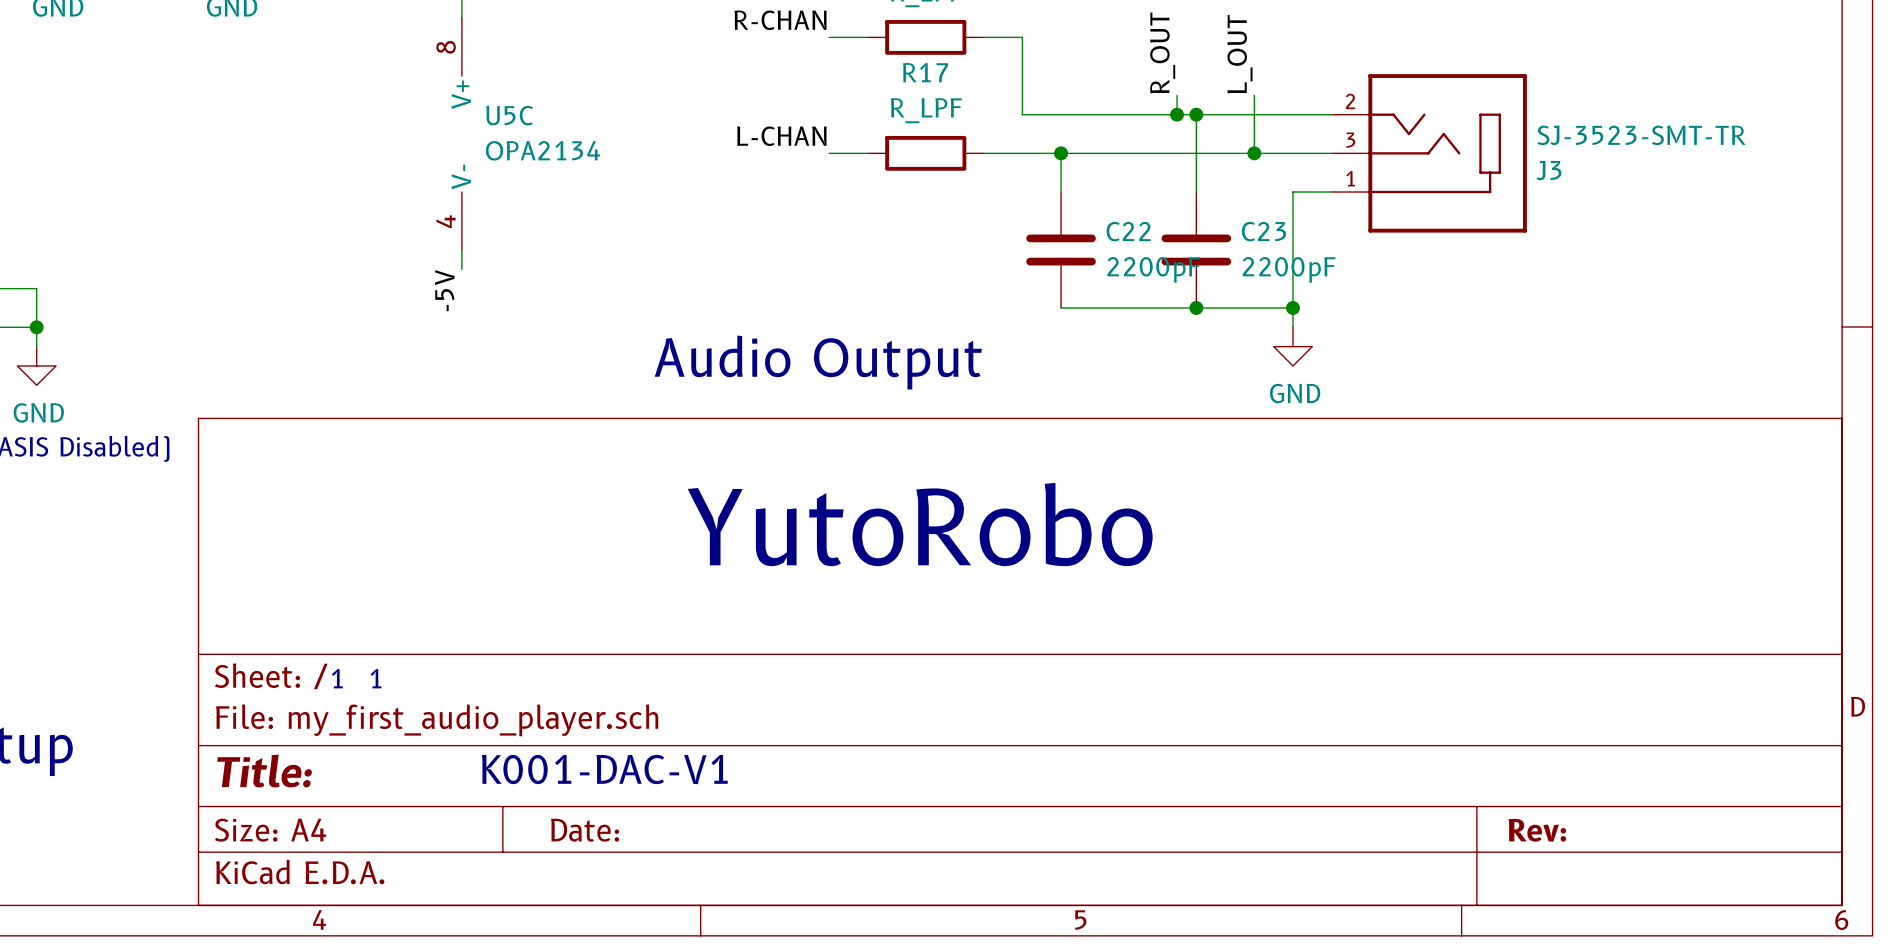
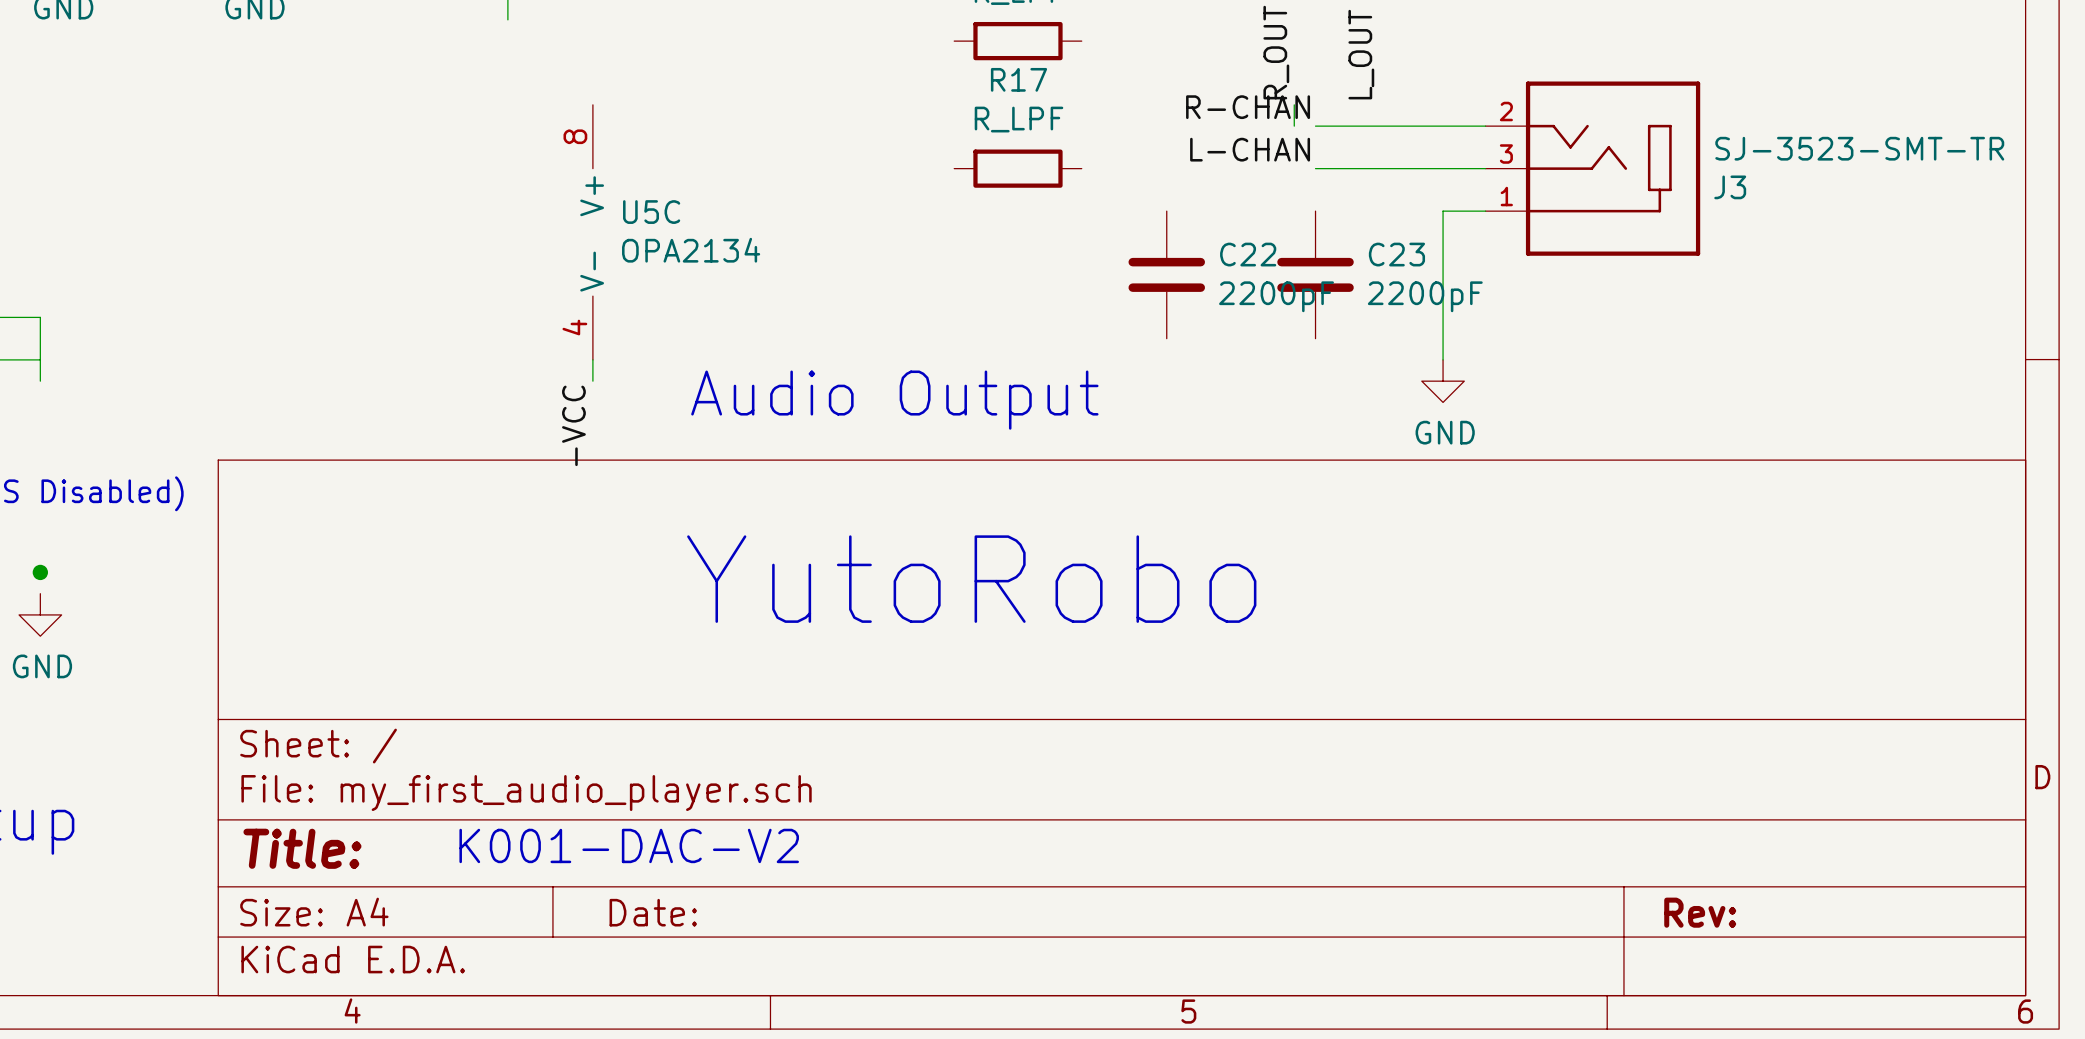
label position: R-CHAN (780, 20) -> R-CHAN (1248, 107)
wire: (829, 37) (867, 37) -> none
wire: (983, 37) (1022, 37) (1022, 114) (1196, 114) (1196, 192) -> none
wire: (1254, 95) (1254, 153) -> none
junction: (1177, 114) -> none
junction: (1196, 114) -> none
U5C position: (461, 134) -> (592, 232)
label position: L-CHAN (781, 136) -> L-CHAN (1250, 149)
wire: (829, 153) (867, 153) -> none
wire: (983, 153) (1196, 153) -> none
wire: (1061, 153) (1061, 192) -> none
junction: (1061, 153) -> none
junction: (1254, 153) -> none
J3 position: (1429, 153) -> (1592, 168)
wire: (1312, 192) (1292, 192) (1292, 327) -> (1443, 211) (1443, 359)
wire: (461, 249) (461, 269) -> (592, 359) (592, 381)
label: -5V (444, 290) -> none
wire: (1061, 307) (1292, 307) -> none
junction: (1196, 307) -> none
junction: (1292, 307) -> none
junction: (36, 327) -> none
power symbol position: GND (1292, 346) -> GND (1443, 381)
text position: Audio Output (818, 362) -> Audio Output (894, 400)
power symbol: GND (36, 365) -> none
label: none -> -VCC (573, 425)
junction: none -> (40, 572)
power symbol: none -> GND (40, 614)
text: 1 (337, 678) -> none
text: 1 (375, 678) -> none
text: K001-DAC-V1 (604, 769) -> K001-DAC-V2 (629, 845)

